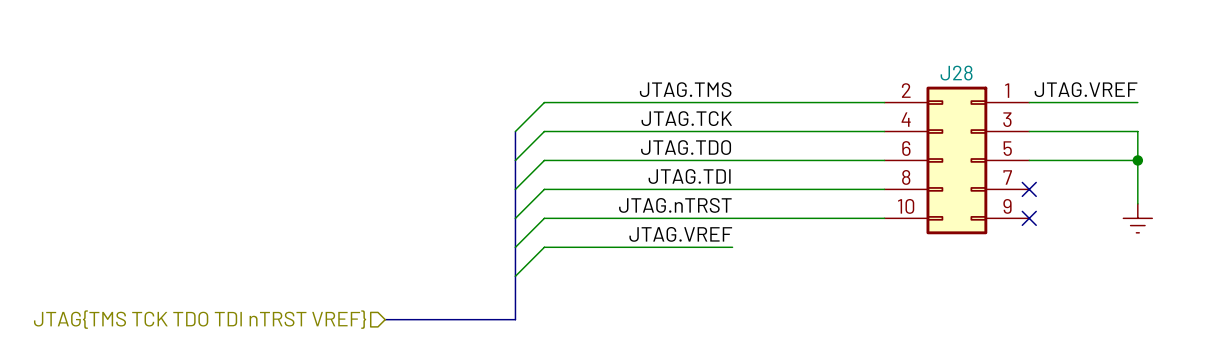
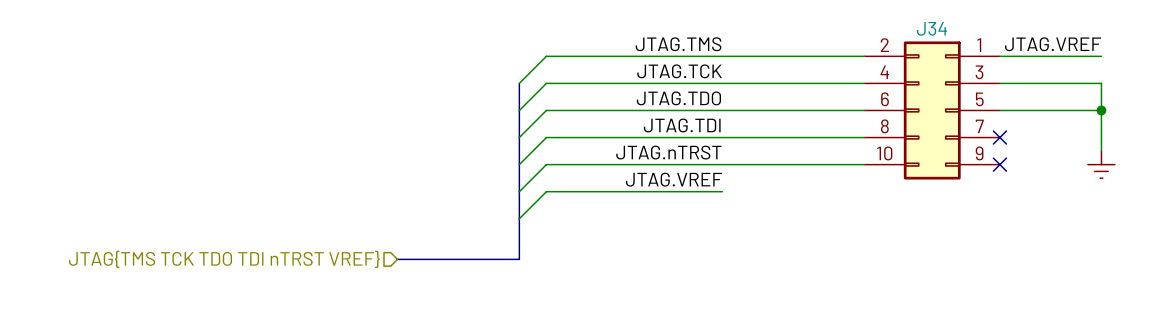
J28 name: J28 (956, 73) -> J34 (931, 28)

